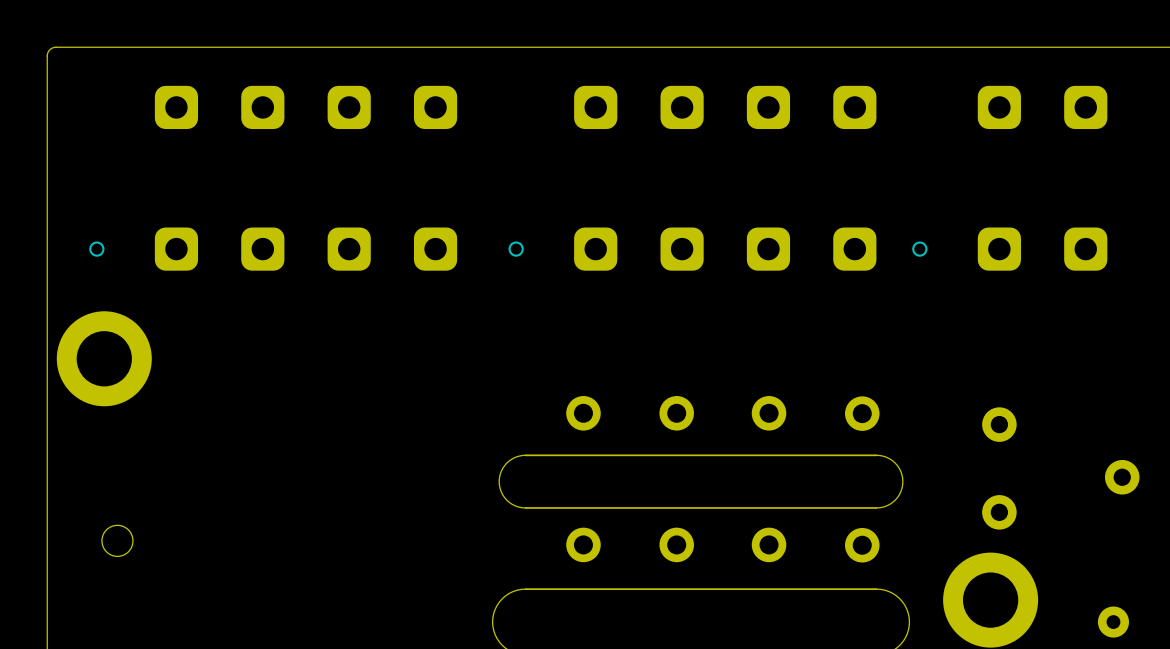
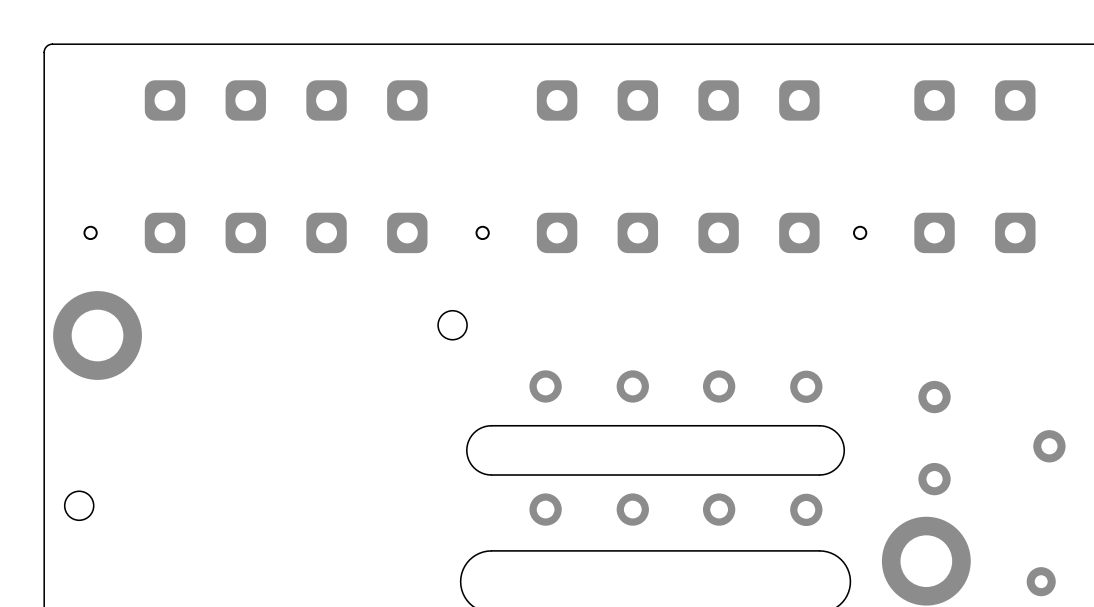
round board edge: none -> [437, 310, 468, 341]
round board edge position: (117, 540) -> (79, 505)

